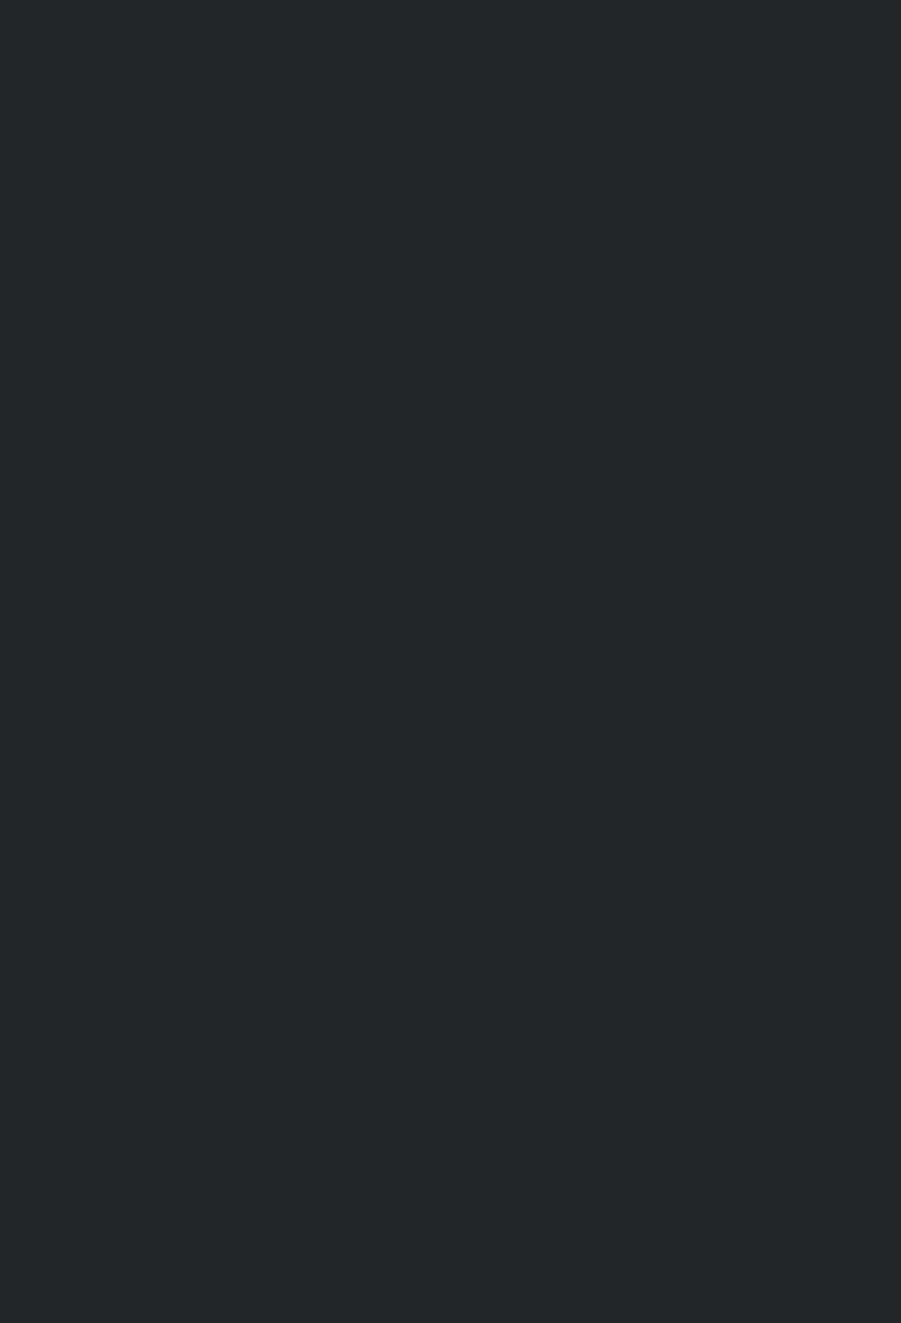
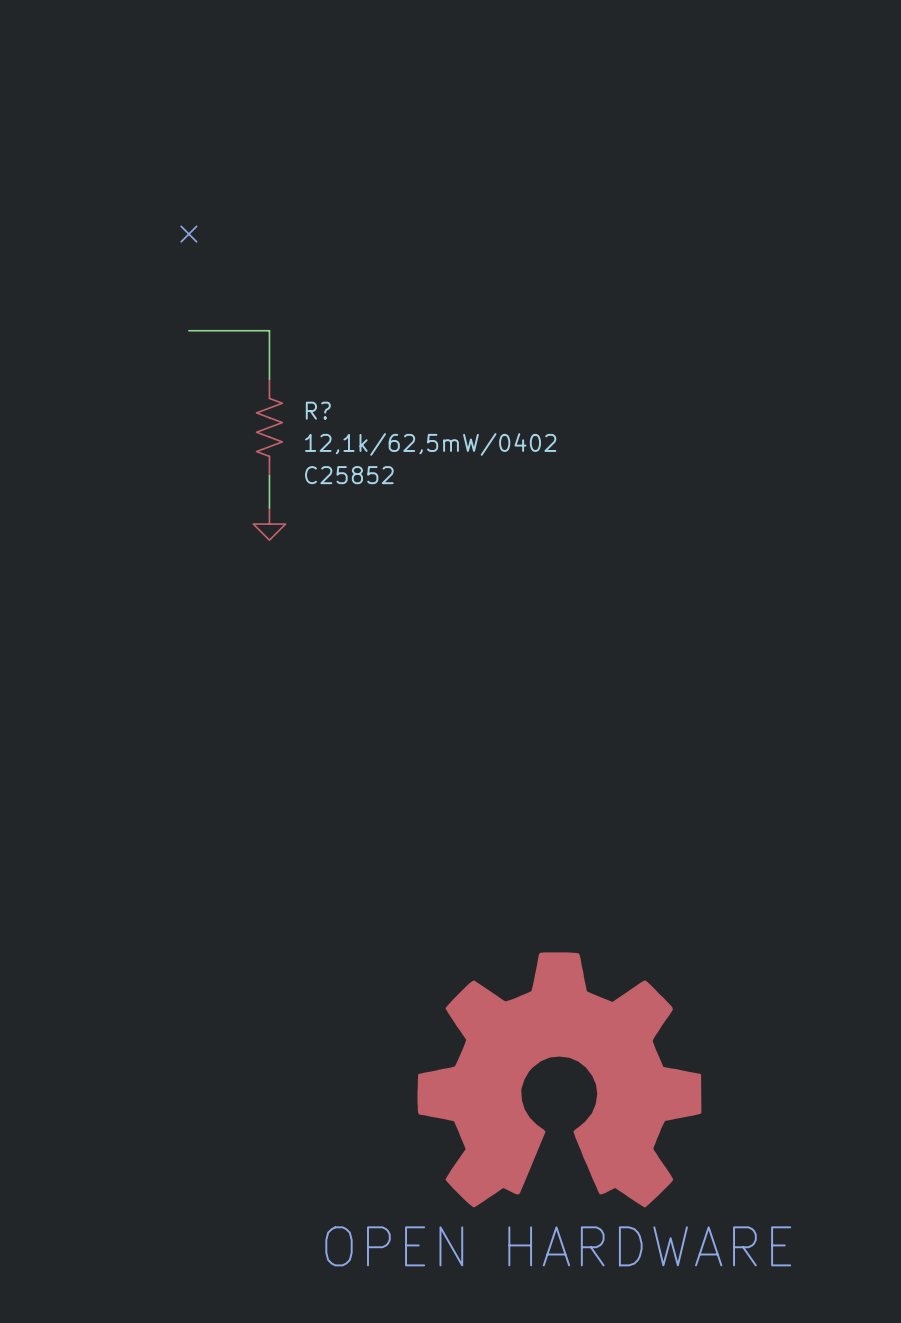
no-connect mark: none -> (188, 234)
wire: none -> (188, 330) (269, 330) (269, 379)
R?: none -> 12,1k/62,5mW/0402 (269, 427)
wire: none -> (269, 475) (269, 507)
power symbol: none -> (269, 524)
part: none -> (559, 1079)
text: none -> OPEN HARDWARE (558, 1246)

